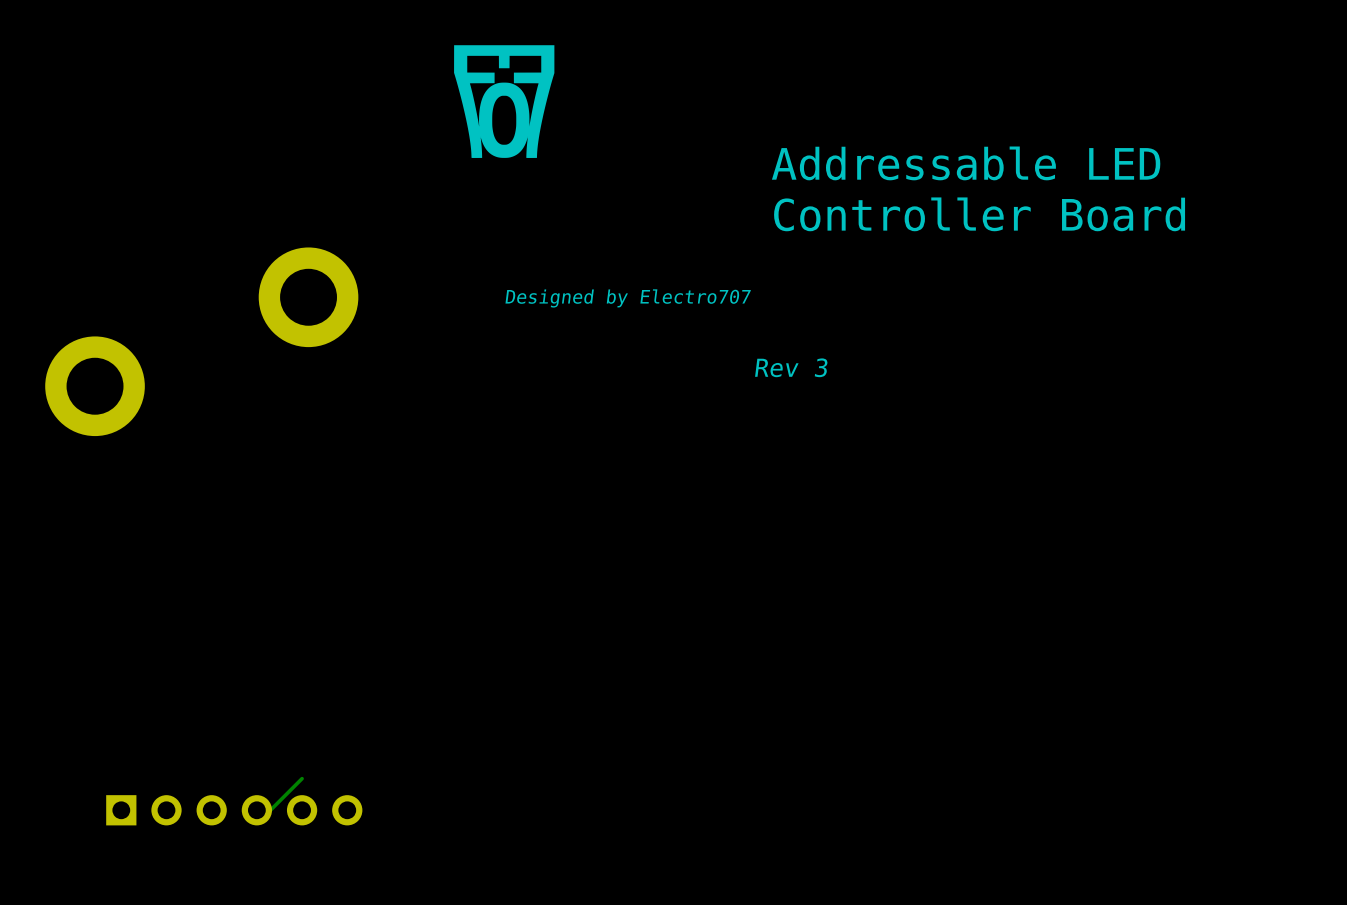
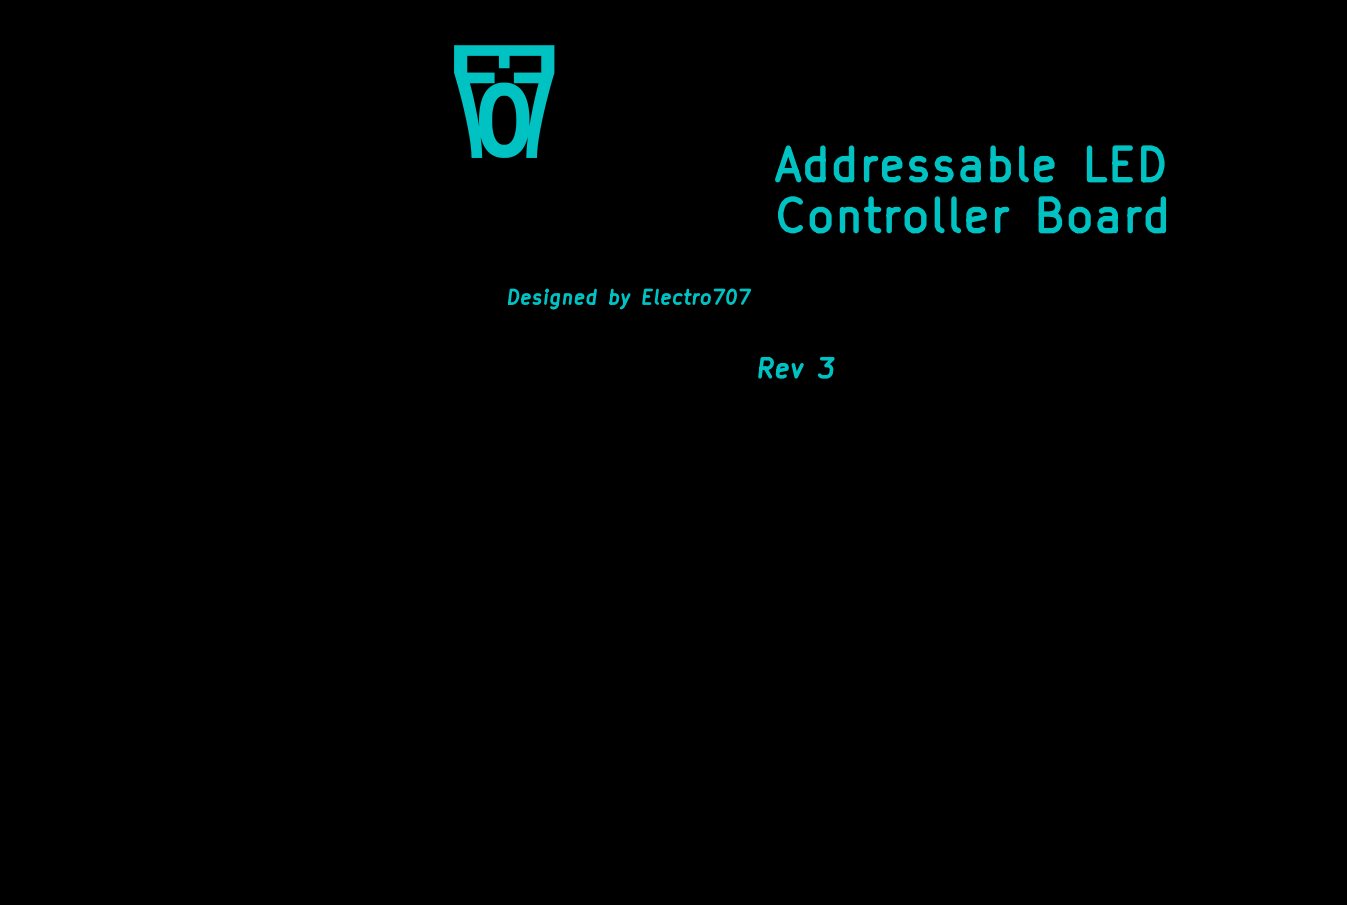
part: (308, 297) -> none
part: (95, 386) -> none
track: (302, 778) (256, 822) -> none
part: (234, 810) -> none

